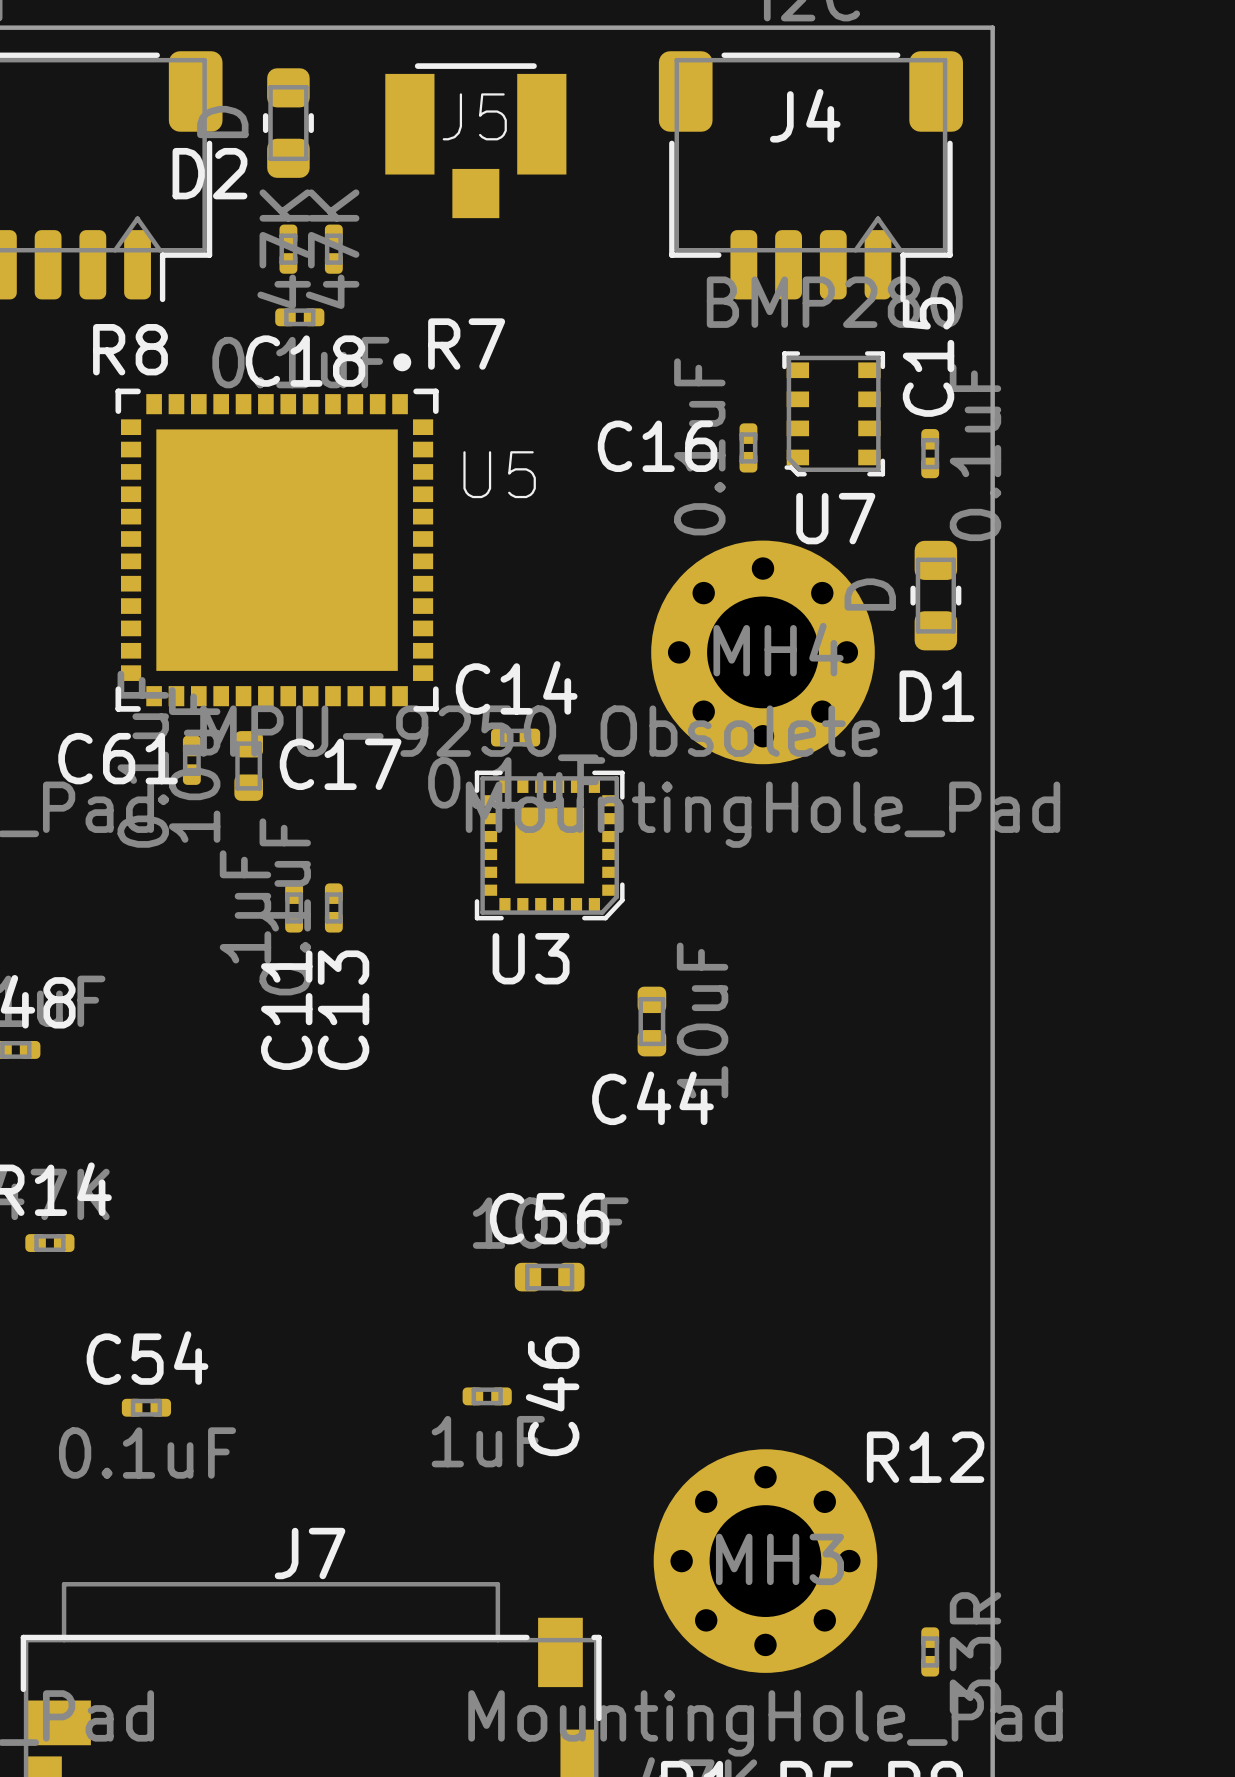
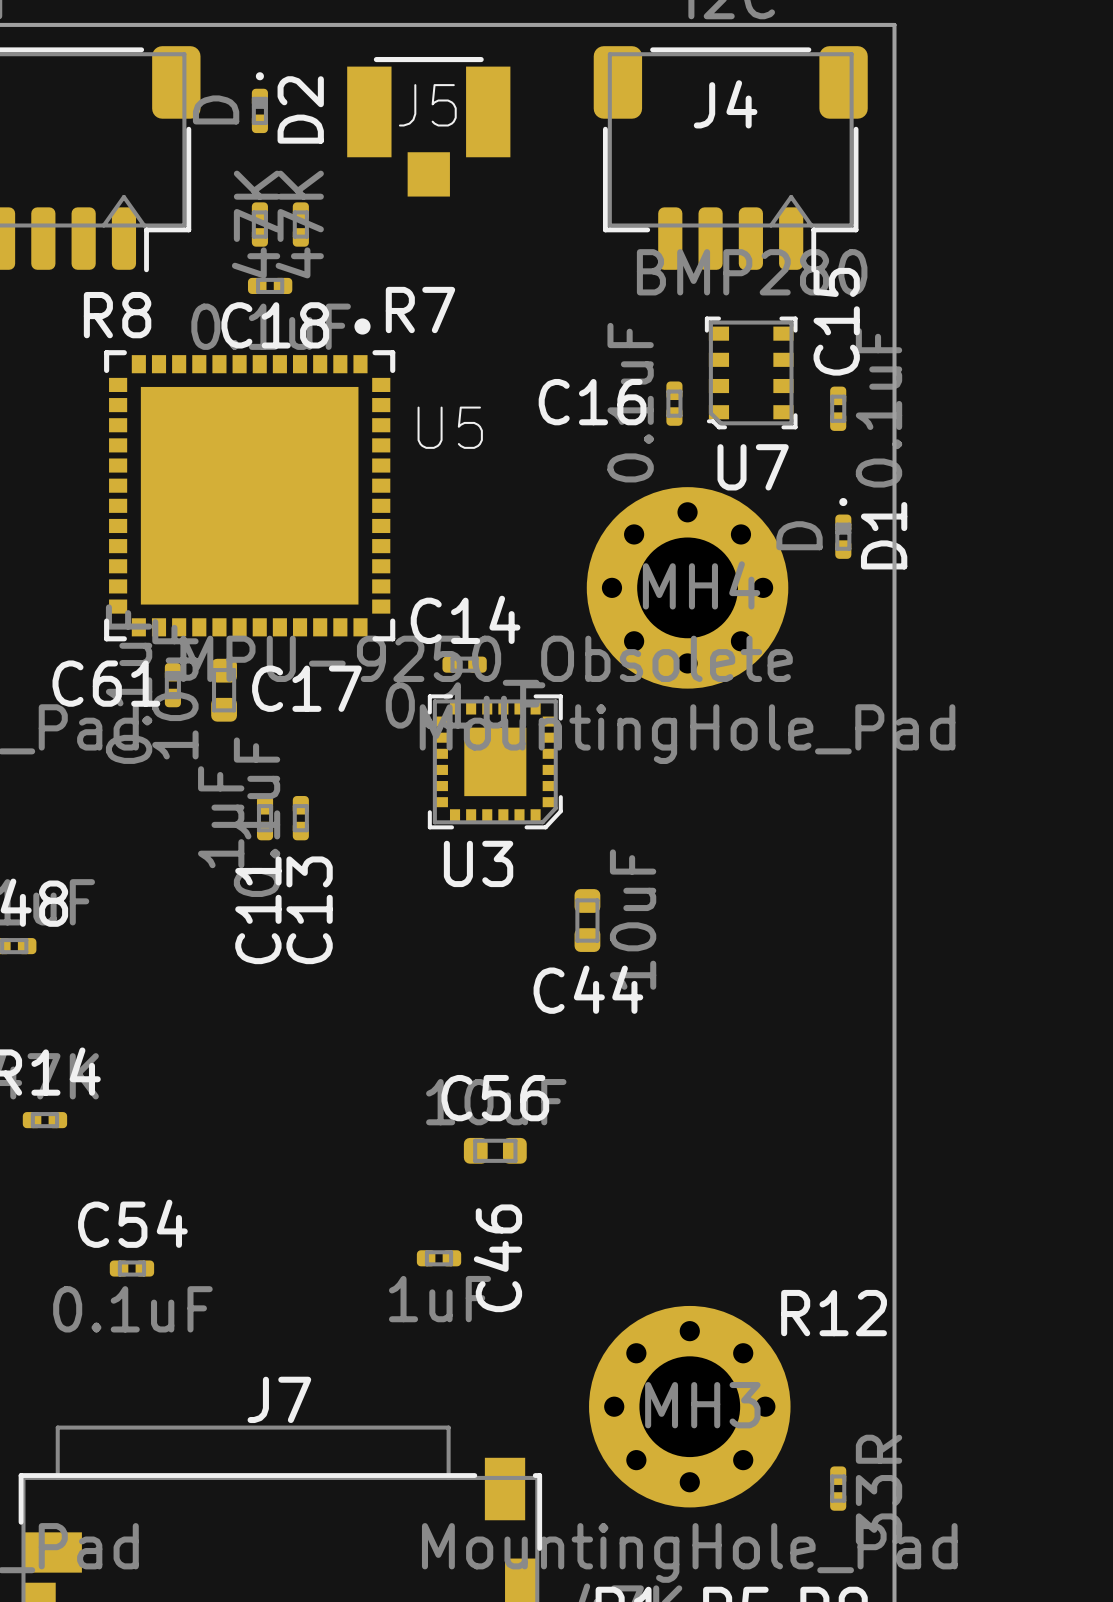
D2 footprint: [262, 68, 314, 178] -> [251, 72, 268, 134]
D2 name position: D2 (209, 173) -> D2 (300, 109)
D1 footprint: [910, 540, 962, 651] -> [835, 498, 852, 559]
D1 name position: D1 (936, 696) -> D1 (884, 535)

